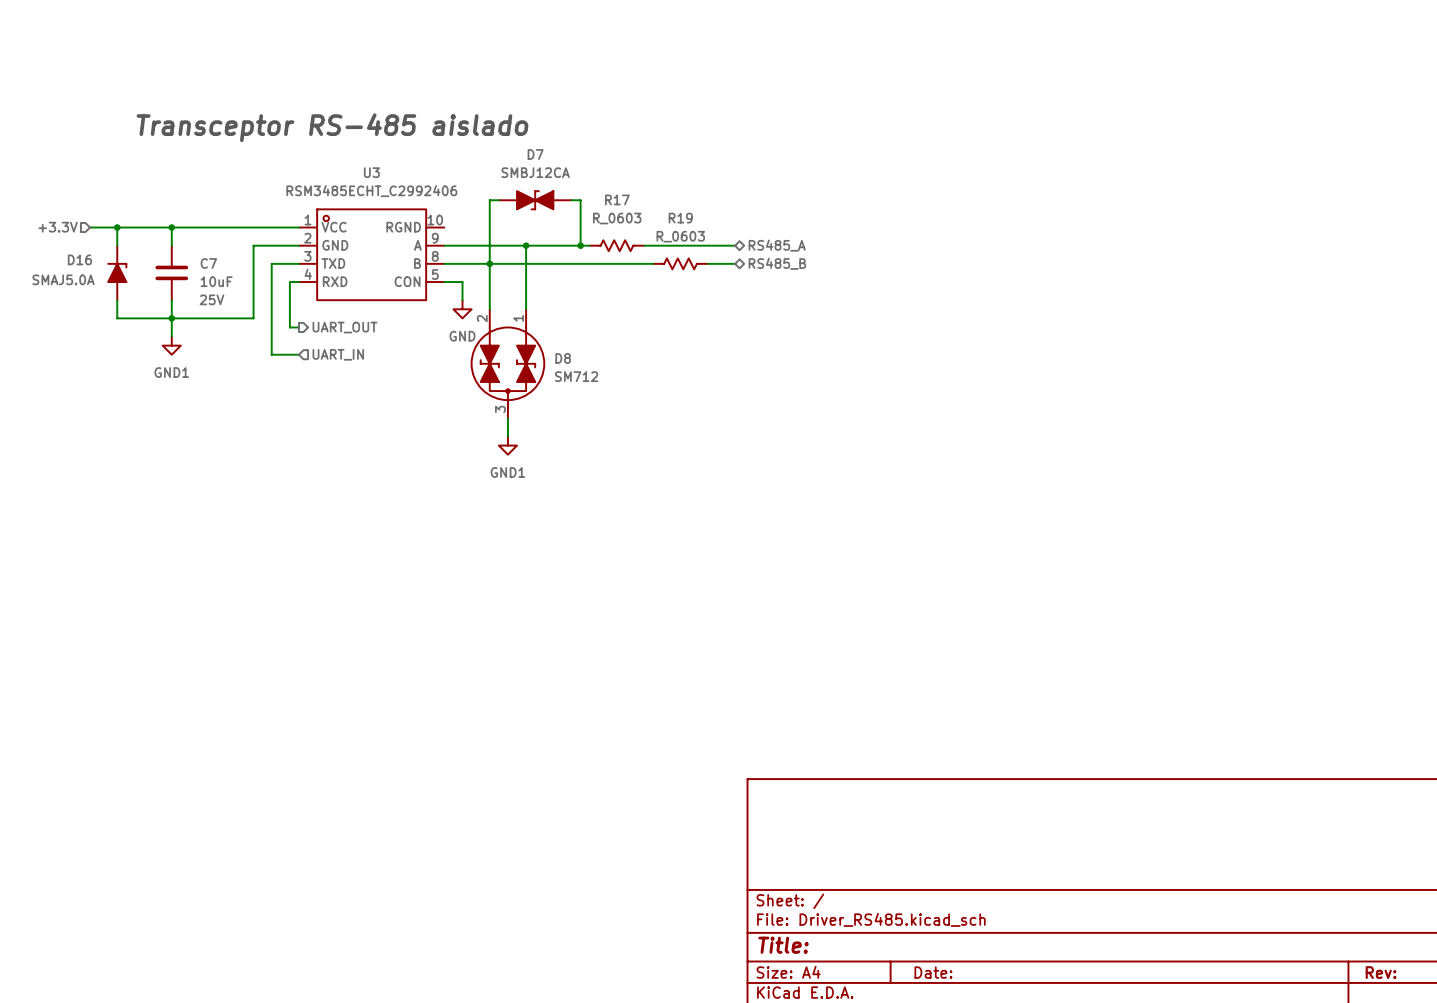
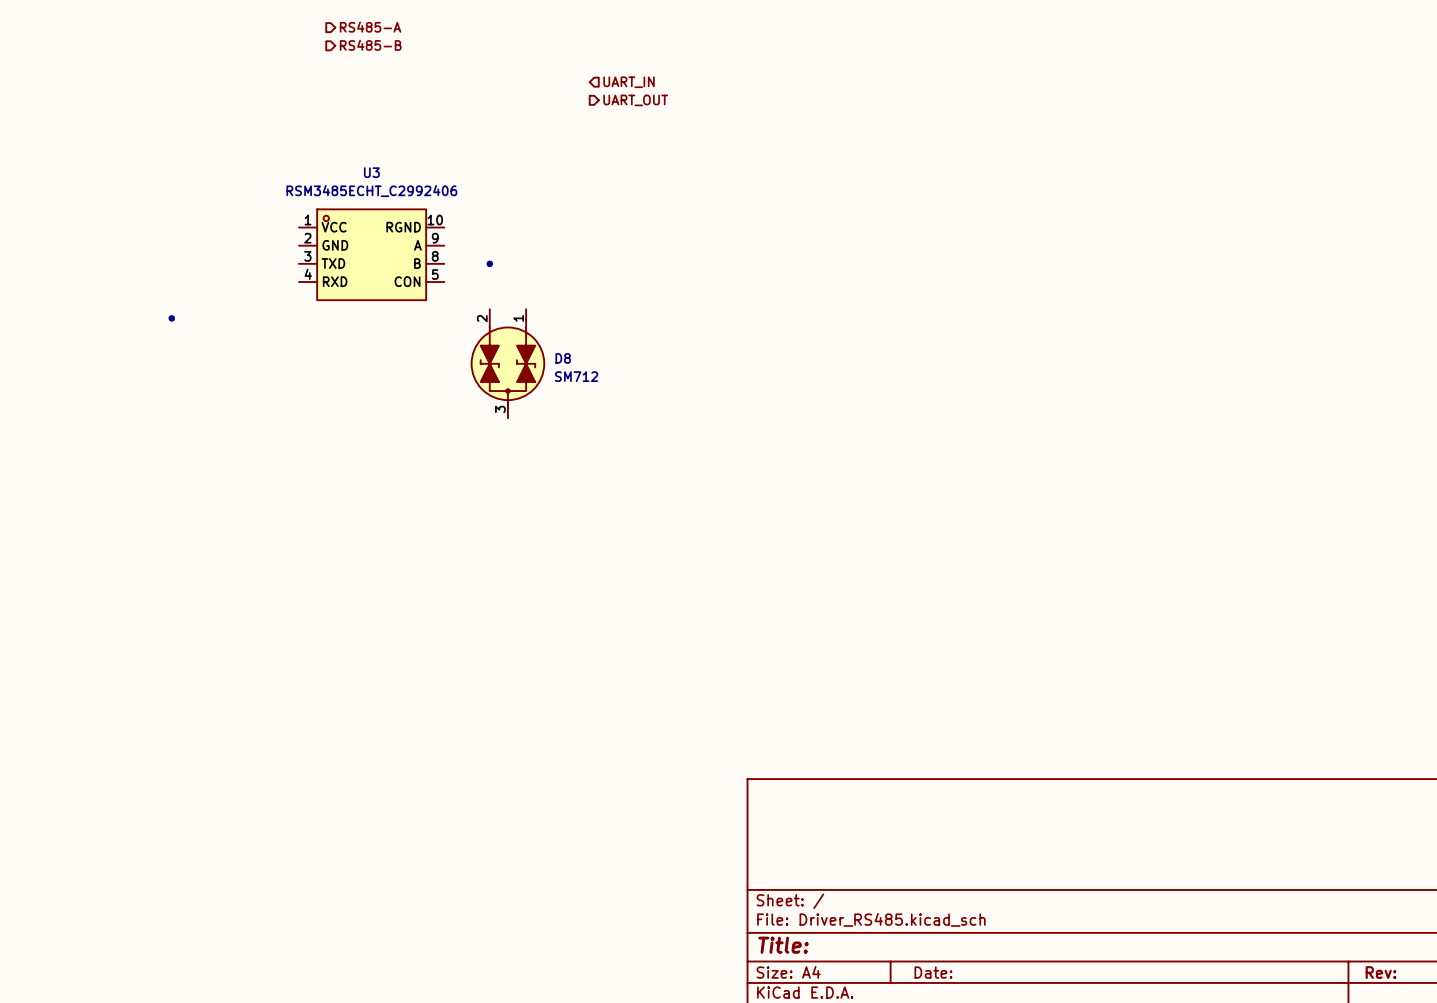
hierarchical label: none -> RS485-A (370, 27)
hierarchical label: none -> RS485-B (370, 45)
hierarchical label: none -> UART_IN (629, 82)
hierarchical label: none -> UART_OUT (635, 100)
text: Transceptor RS-485 aislado (332, 127) -> none
wire: (498, 200) (489, 200) (489, 309) -> none
D7: SMBJ12CA (535, 200) -> none
wire: (571, 200) (580, 200) (580, 245) -> none
hierarchical label: +3.3V (58, 227) -> none
wire: (90, 227) (298, 227) -> none
wire: (117, 227) (117, 245) -> none
junction: (117, 227) -> none
wire: (171, 227) (171, 245) -> none
junction: (171, 227) -> none
wire: (298, 245) (253, 245) (253, 318) (117, 318) (117, 300) -> none
wire: (444, 245) (589, 245) -> none
wire: (526, 245) (526, 309) -> none
junction: (526, 245) -> none
junction: (580, 245) -> none
R17: R_0603 (616, 245) -> none
wire: (644, 245) (735, 245) -> none
hierarchical label: RS485_A (777, 245) -> none
wire: (298, 263) (271, 263) (271, 354) (298, 354) -> none
wire: (444, 263) (653, 263) -> none
R19: R_0603 (680, 263) -> none
wire: (707, 263) (735, 263) -> none
hierarchical label: RS485_B (777, 263) -> none
D16: SMAJ5.0A (117, 272) -> none
C7: 10uF (171, 272) -> none
wire: (298, 282) (289, 282) (289, 327) (298, 327) -> none
wire: (444, 282) (462, 282) (462, 300) -> none
wire: (171, 300) (171, 336) -> none
power symbol: GND (462, 309) -> none
hierarchical label: UART_OUT (344, 327) -> none
power symbol: GND1 (171, 345) -> none
hierarchical label: UART_IN (338, 354) -> none
wire: (507, 418) (507, 436) -> none
power symbol: GND1 (507, 445) -> none

